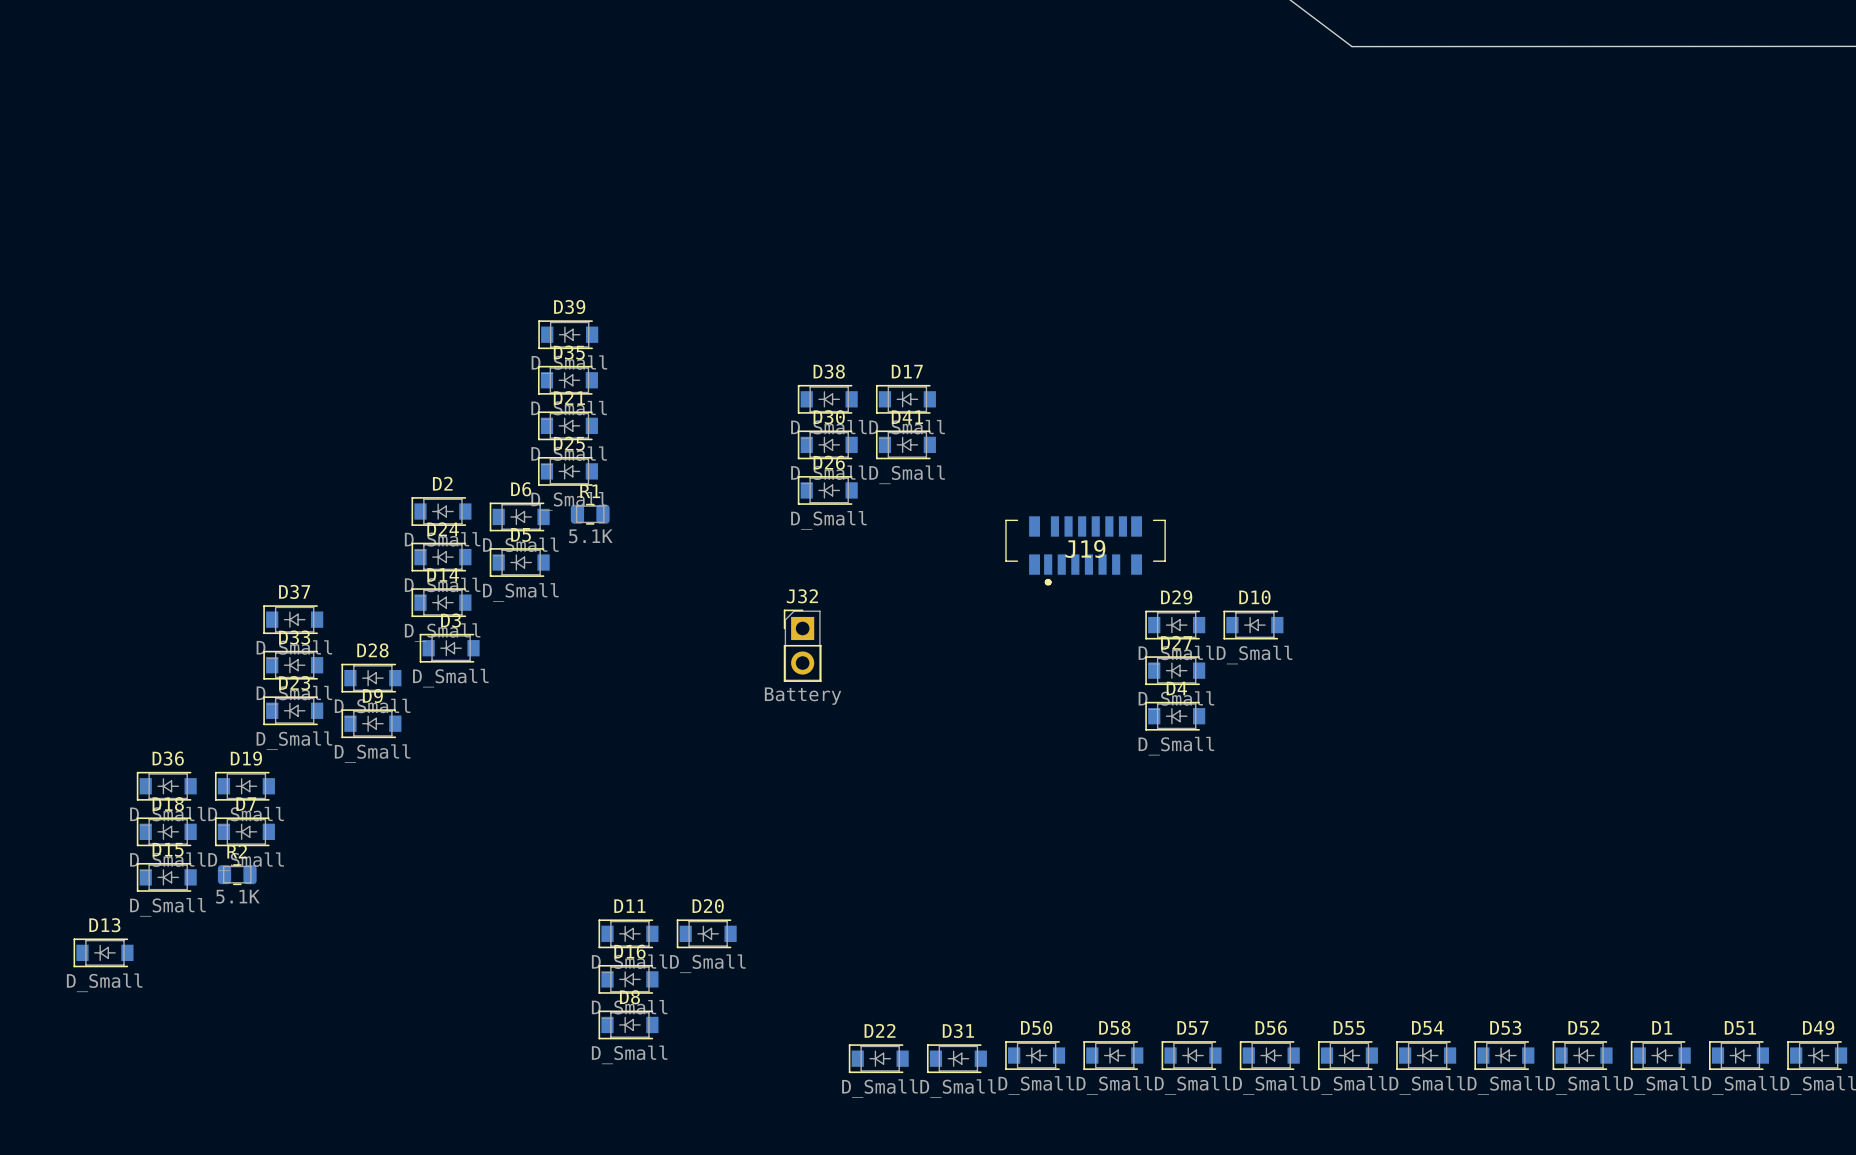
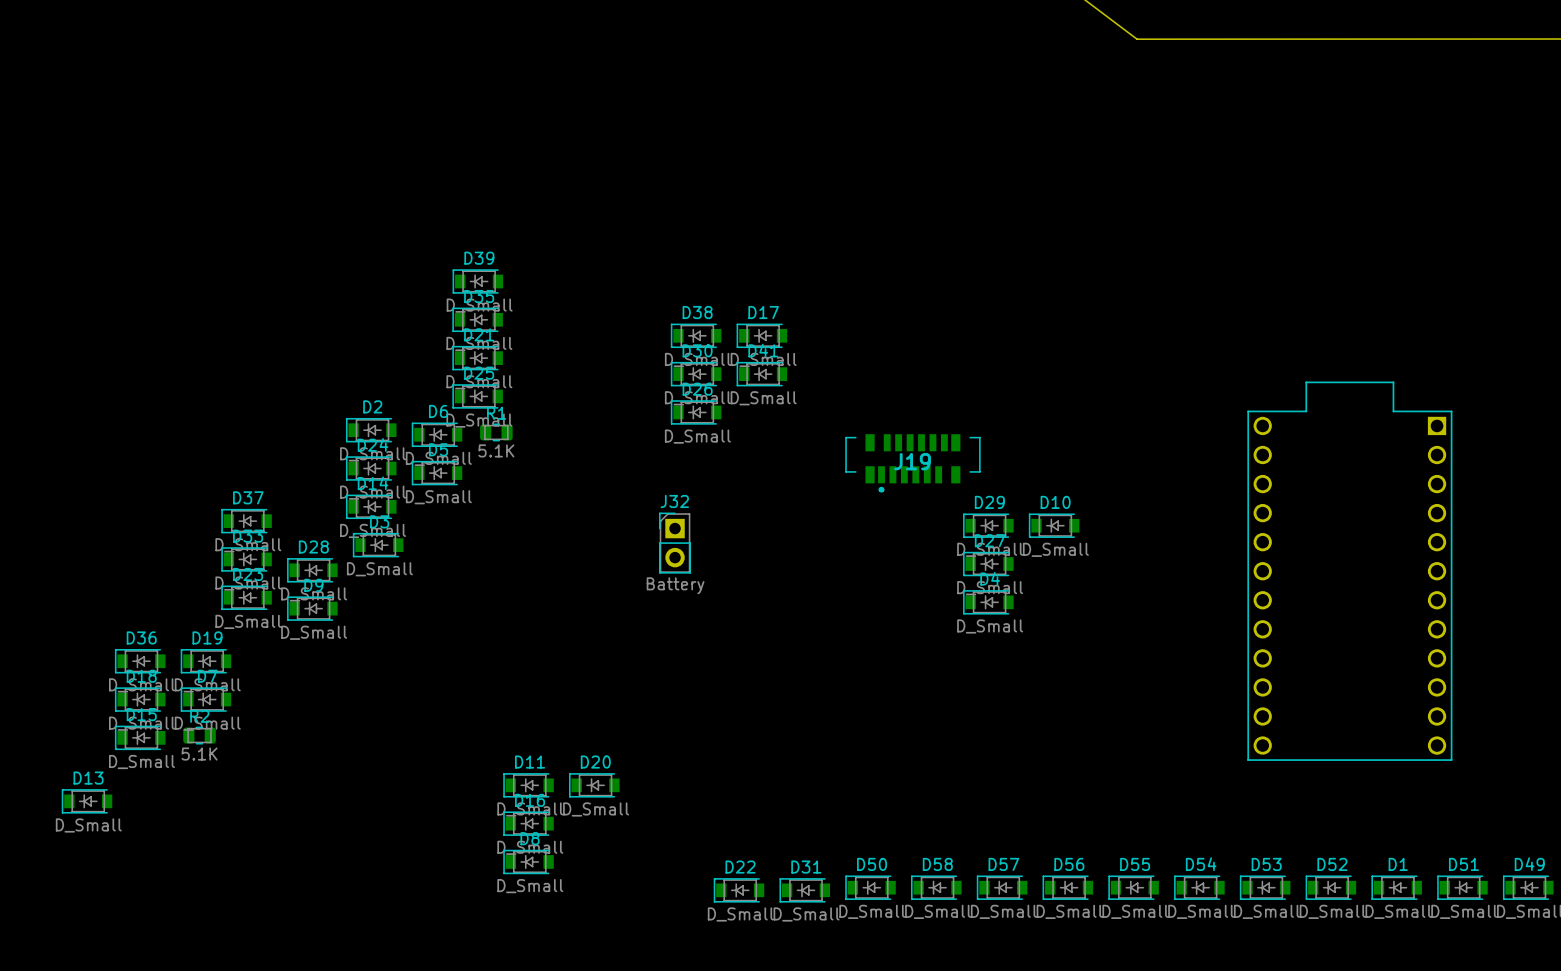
part: none -> (1349, 571)

